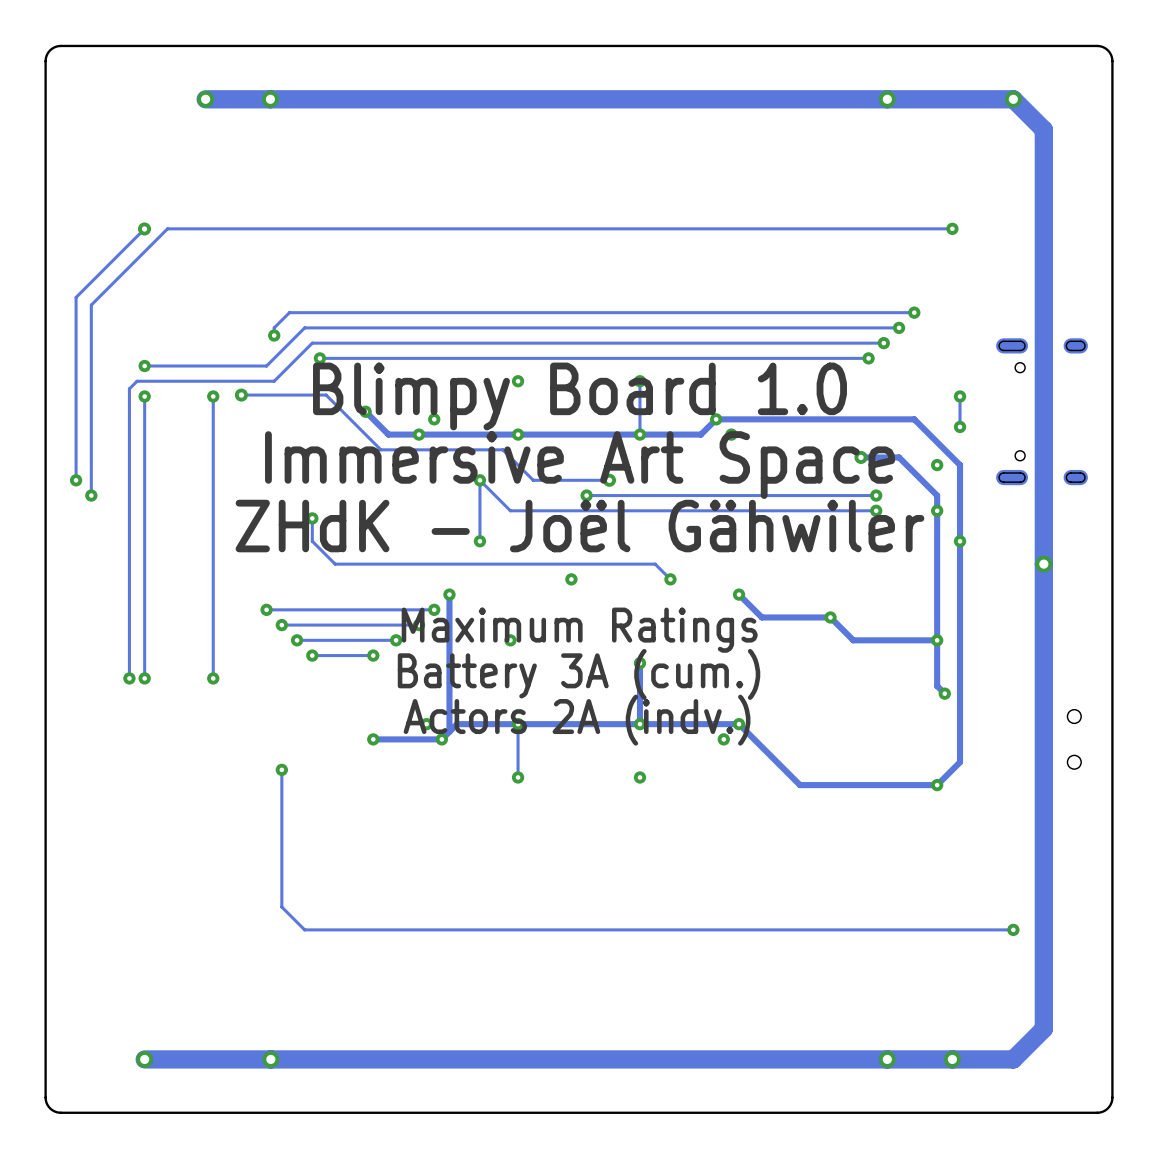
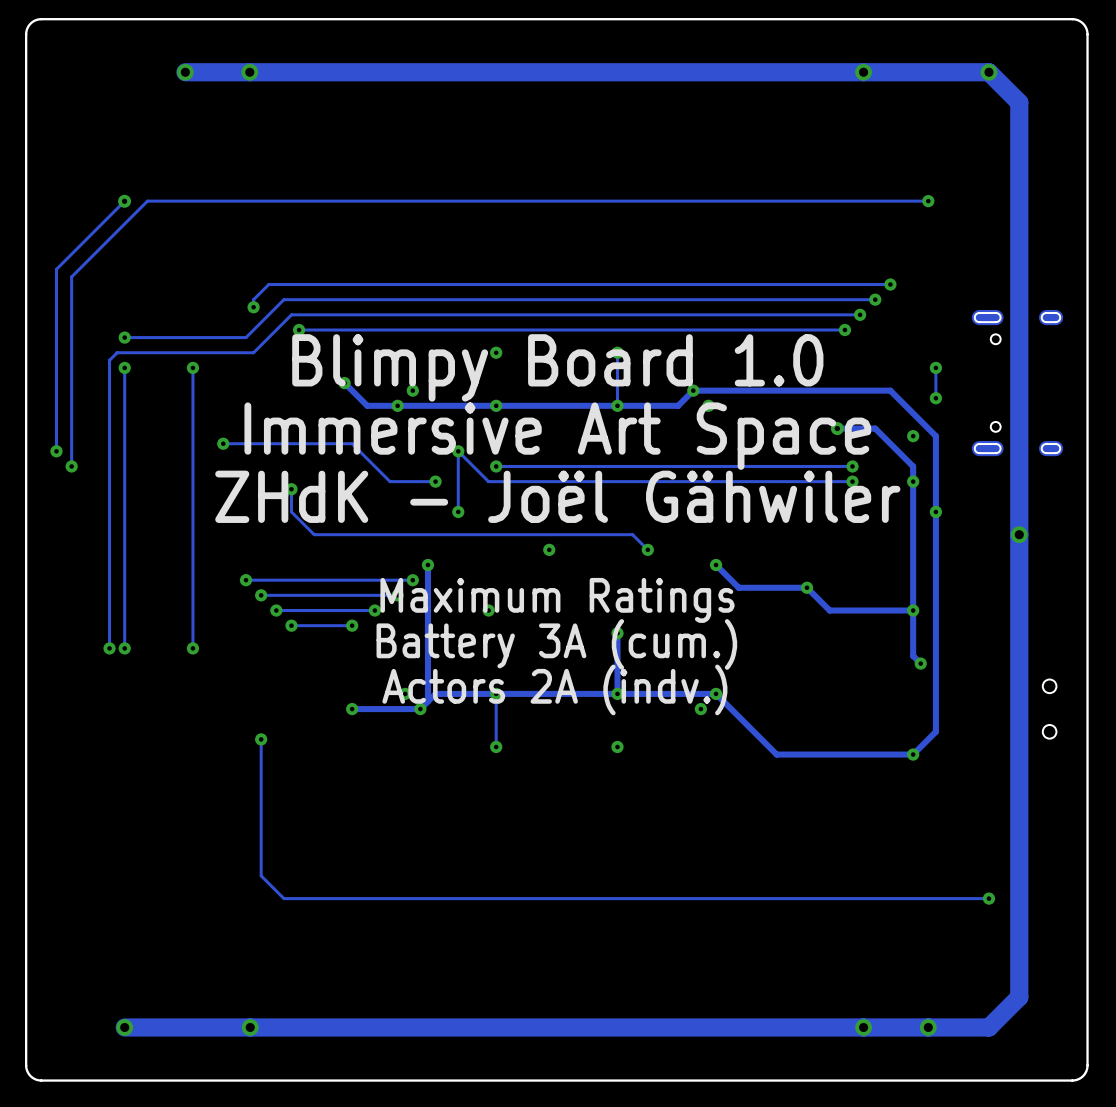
track: (241, 395) (326, 395) (380, 449) (502, 449) (533, 480) (609, 480) -> none
via: (241, 395) -> none
track: none -> (223, 443) (352, 443) (390, 481) (435, 481)
via: none -> (223, 443)
via: (609, 480) -> none
via: none -> (496, 466)
track: none -> (564, 466) (496, 466)
via: (586, 495) -> none
via: none -> (435, 481)

